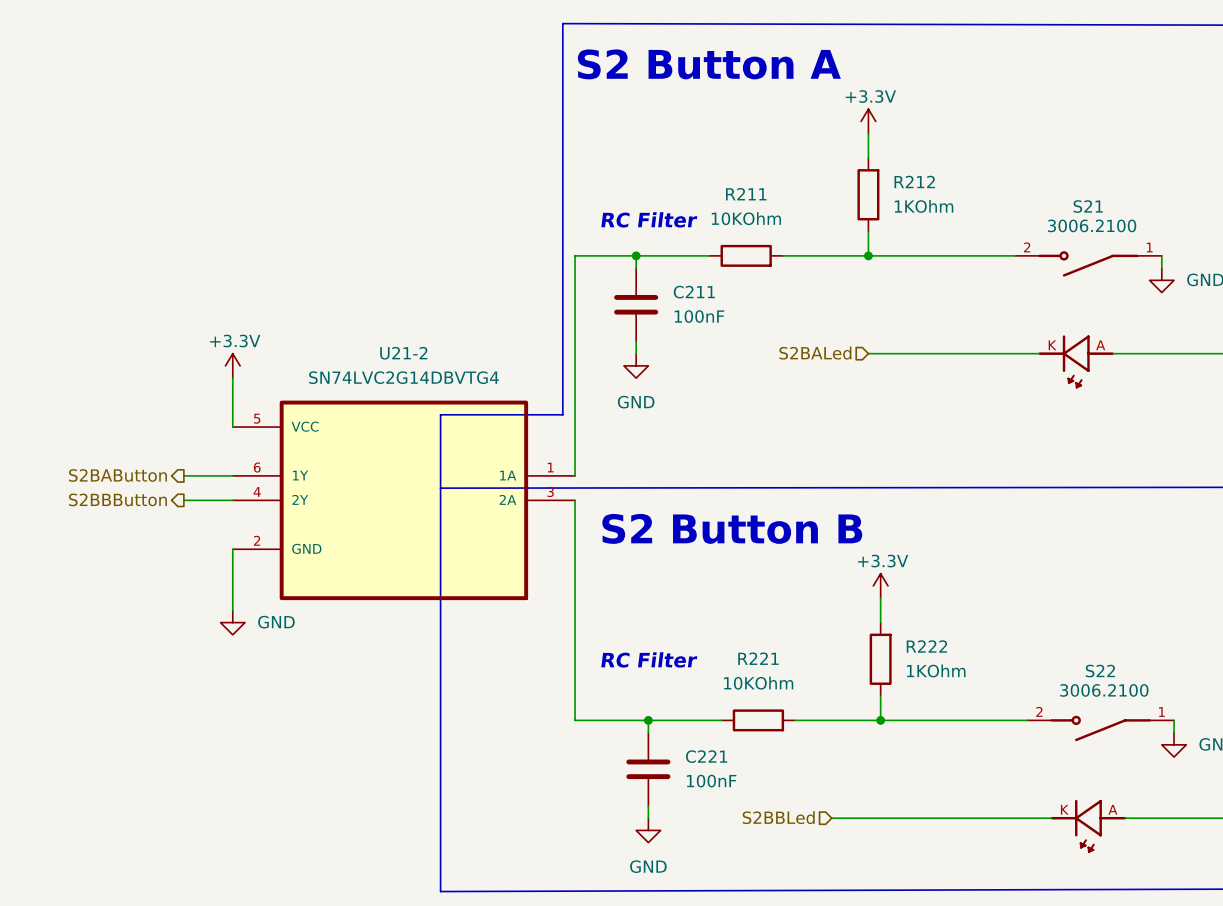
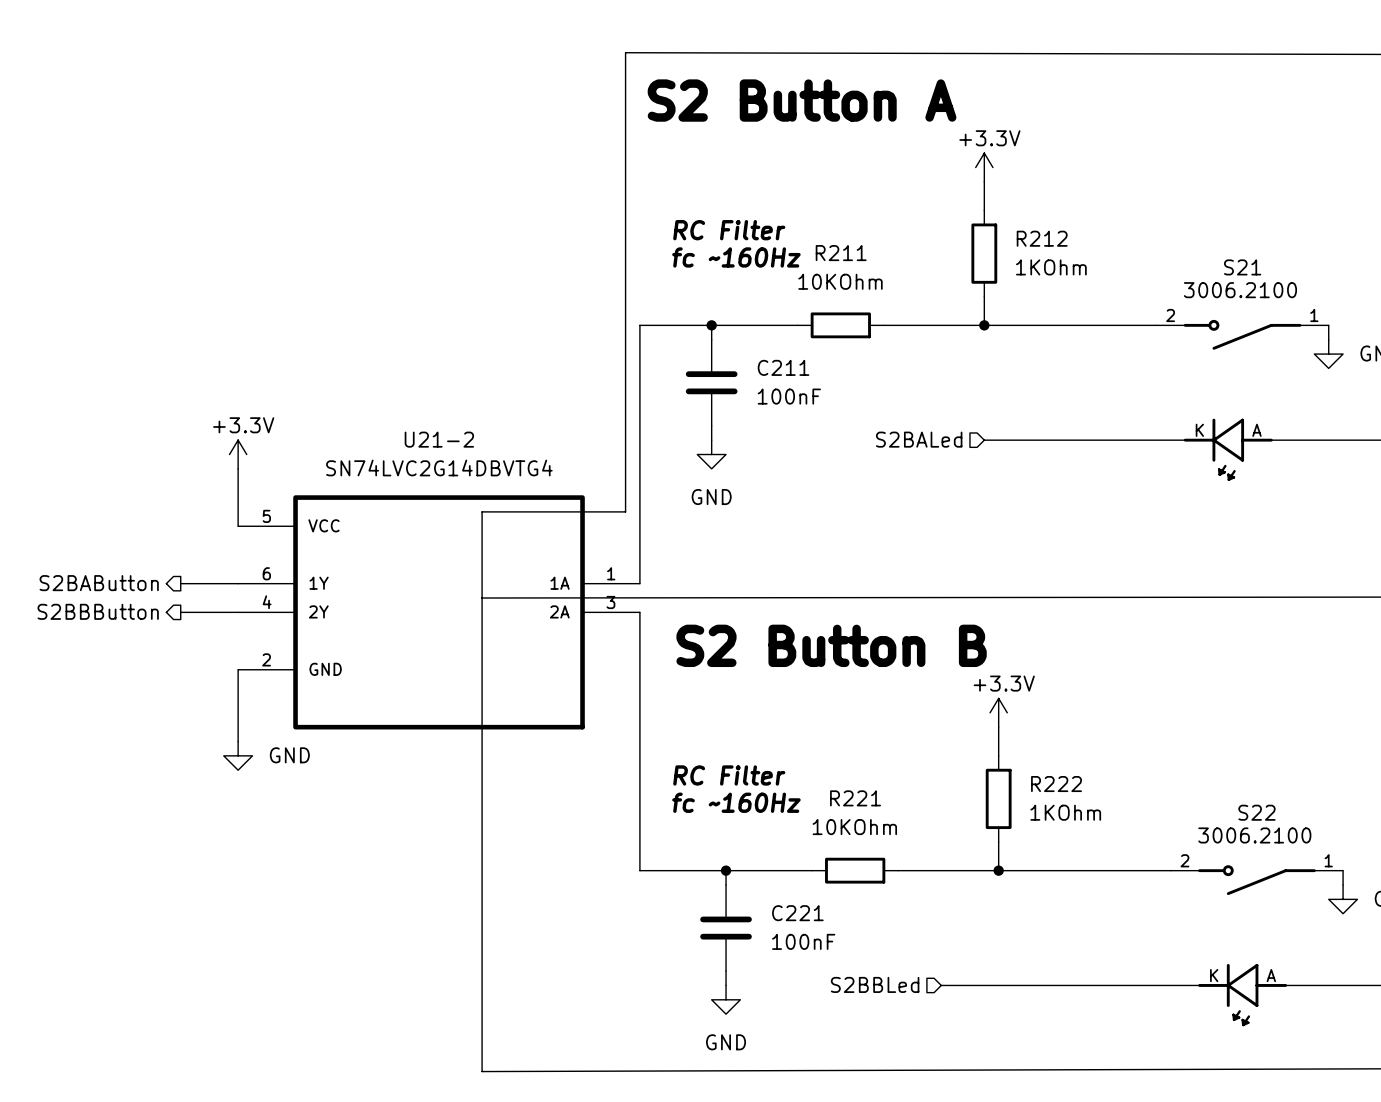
text: none -> fc ~160Hz (736, 257)
text position: RC Filter (649, 219) -> RC Filter (729, 230)
text: none -> RC Filter (729, 775)
text: RC Filter (649, 659) -> fc ~160Hz (736, 802)

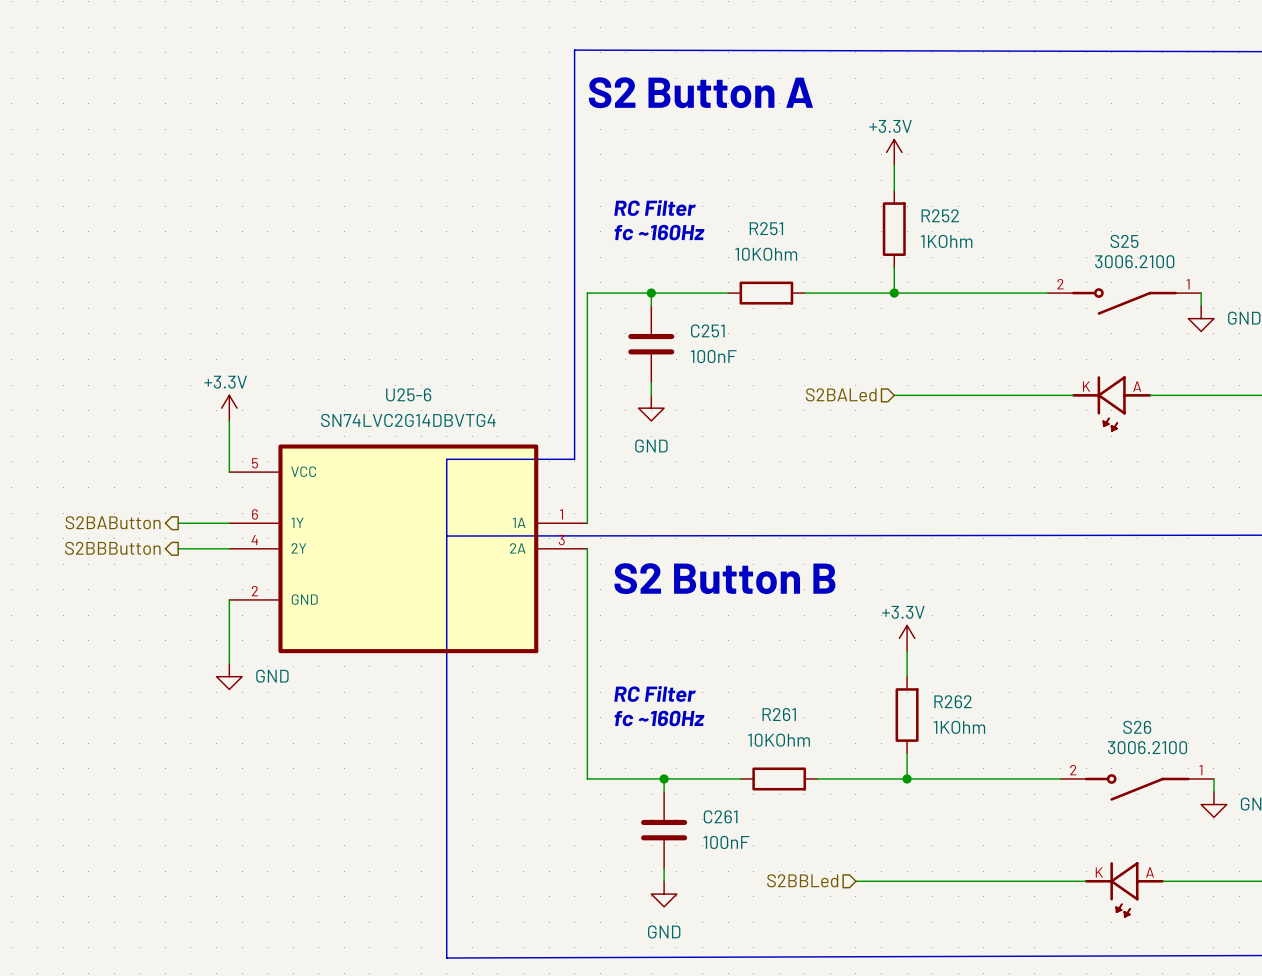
R212 name: R212 (1042, 238) -> R252 (940, 215)
R211 name: R211 (841, 253) -> R251 (766, 228)
S21 name: S21 (1242, 267) -> S25 (1124, 241)
C211 name: C211 (783, 367) -> C251 (707, 330)
U21-2 name: U21-2 (439, 439) -> U25-6 (408, 394)
R222 name: R222 (1056, 784) -> R262 (953, 701)
R221 name: R221 (855, 798) -> R261 (779, 714)
S22 name: S22 (1256, 812) -> S26 (1137, 727)
C221 name: C221 (797, 913) -> C261 (720, 816)

